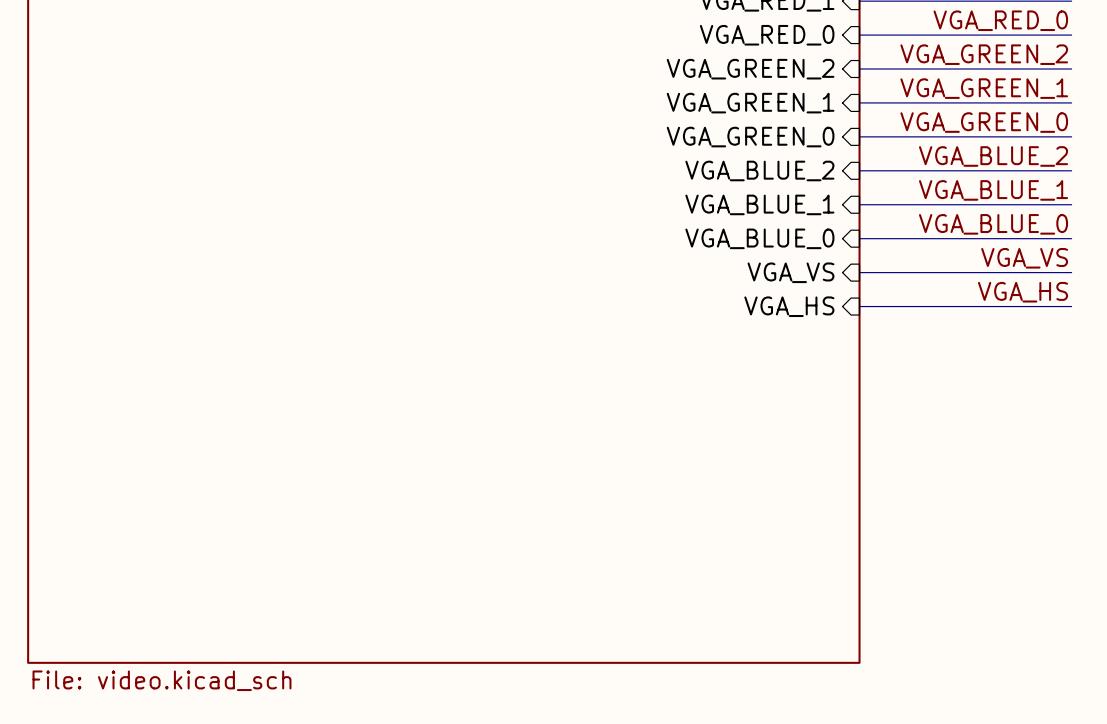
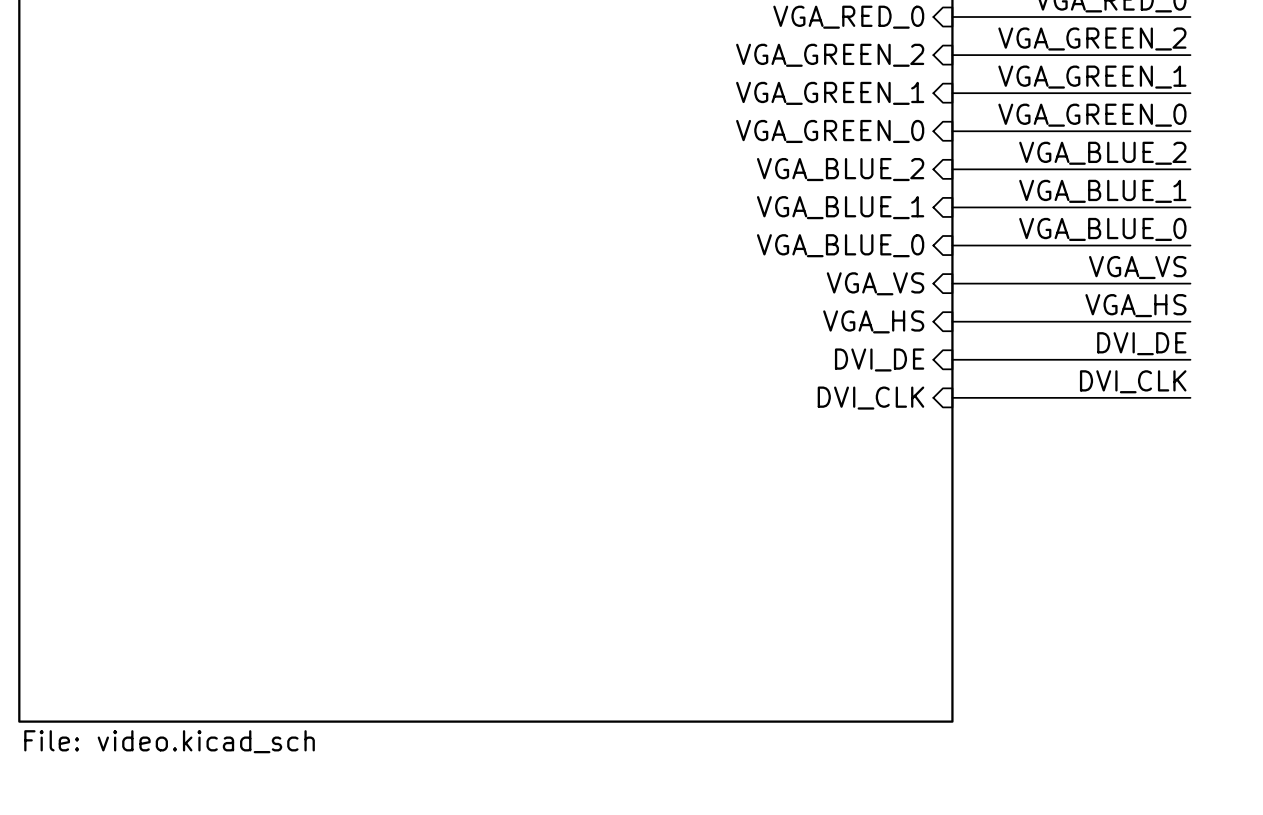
label: none -> DVI_DE (1141, 343)
sheet pin: none -> DVI_DE (879, 359)
wire: none -> (952, 359) (1190, 359)
label: none -> DVI_CLK (1133, 381)
sheet pin: none -> DVI_CLK (870, 398)
wire: none -> (952, 397) (1190, 397)

